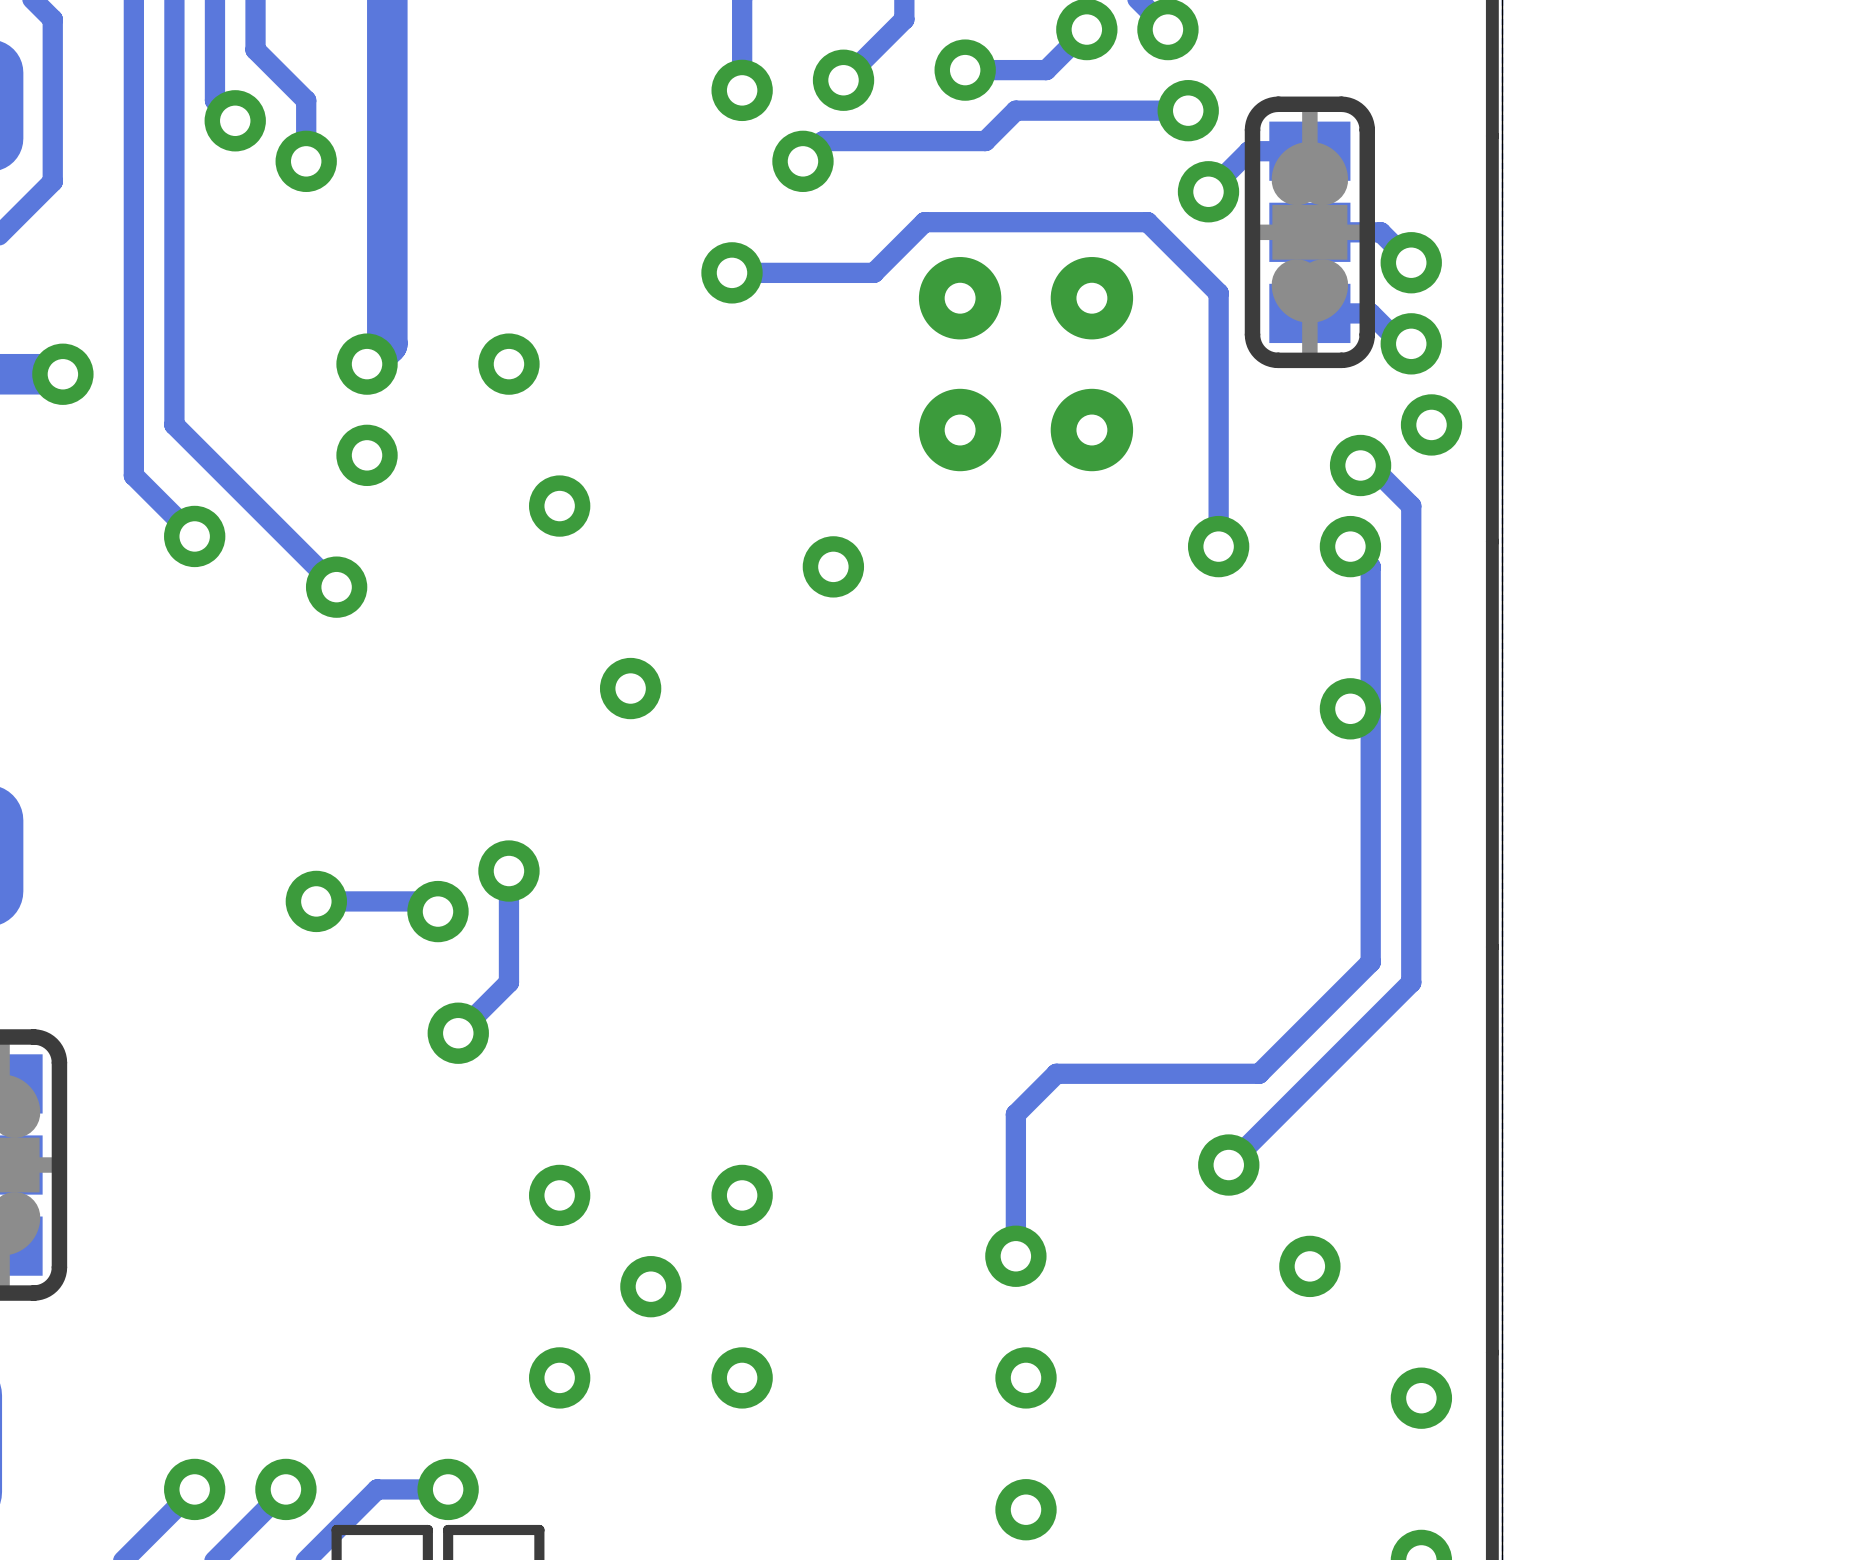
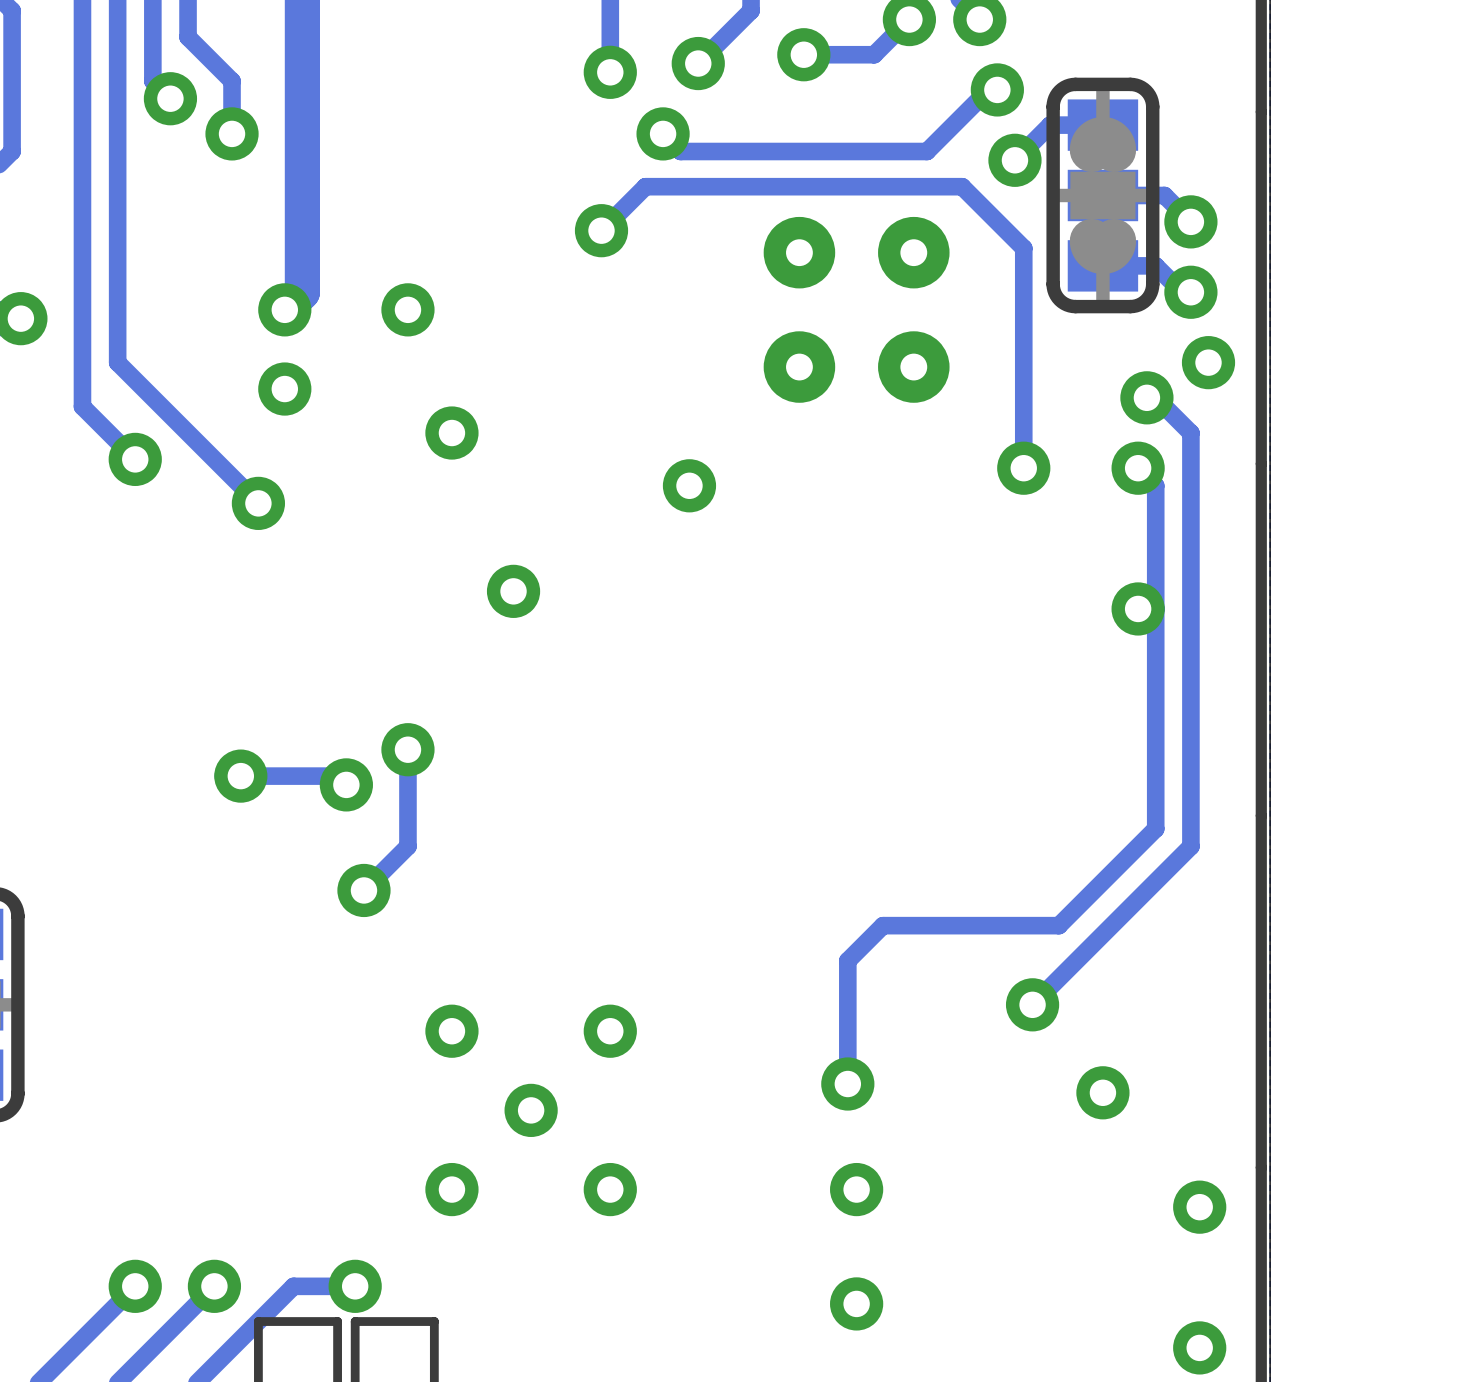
track: (1178, 110) (1015, 110) (985, 141) (823, 141) (802, 161) -> (988, 89) (926, 151) (680, 151) (663, 133)
track: (924, 222) (873, 272) (732, 272) -> (768, 186) (645, 186) (601, 230)

